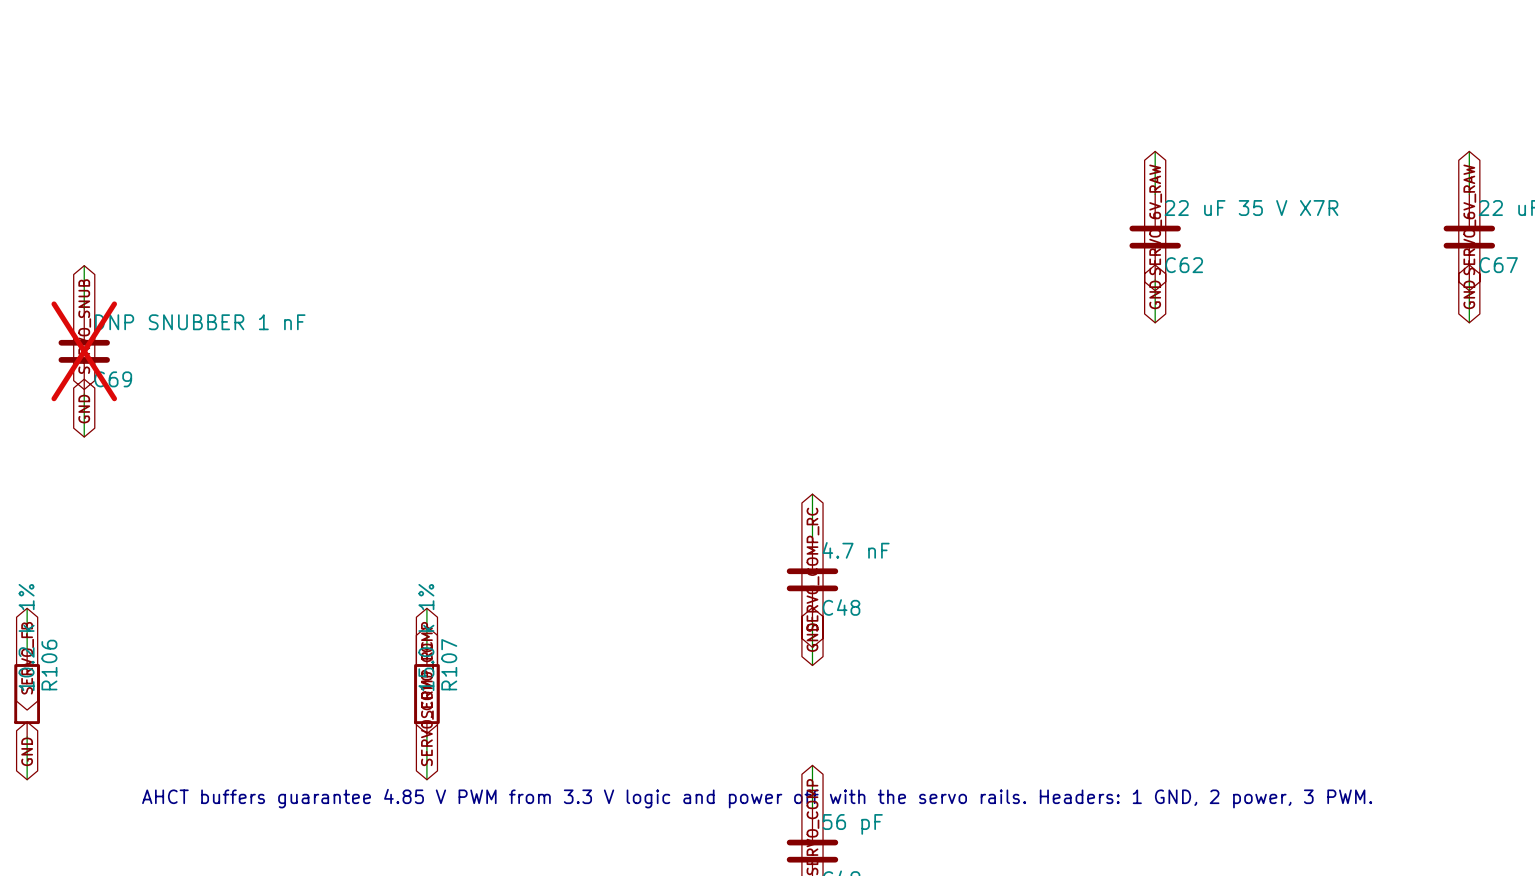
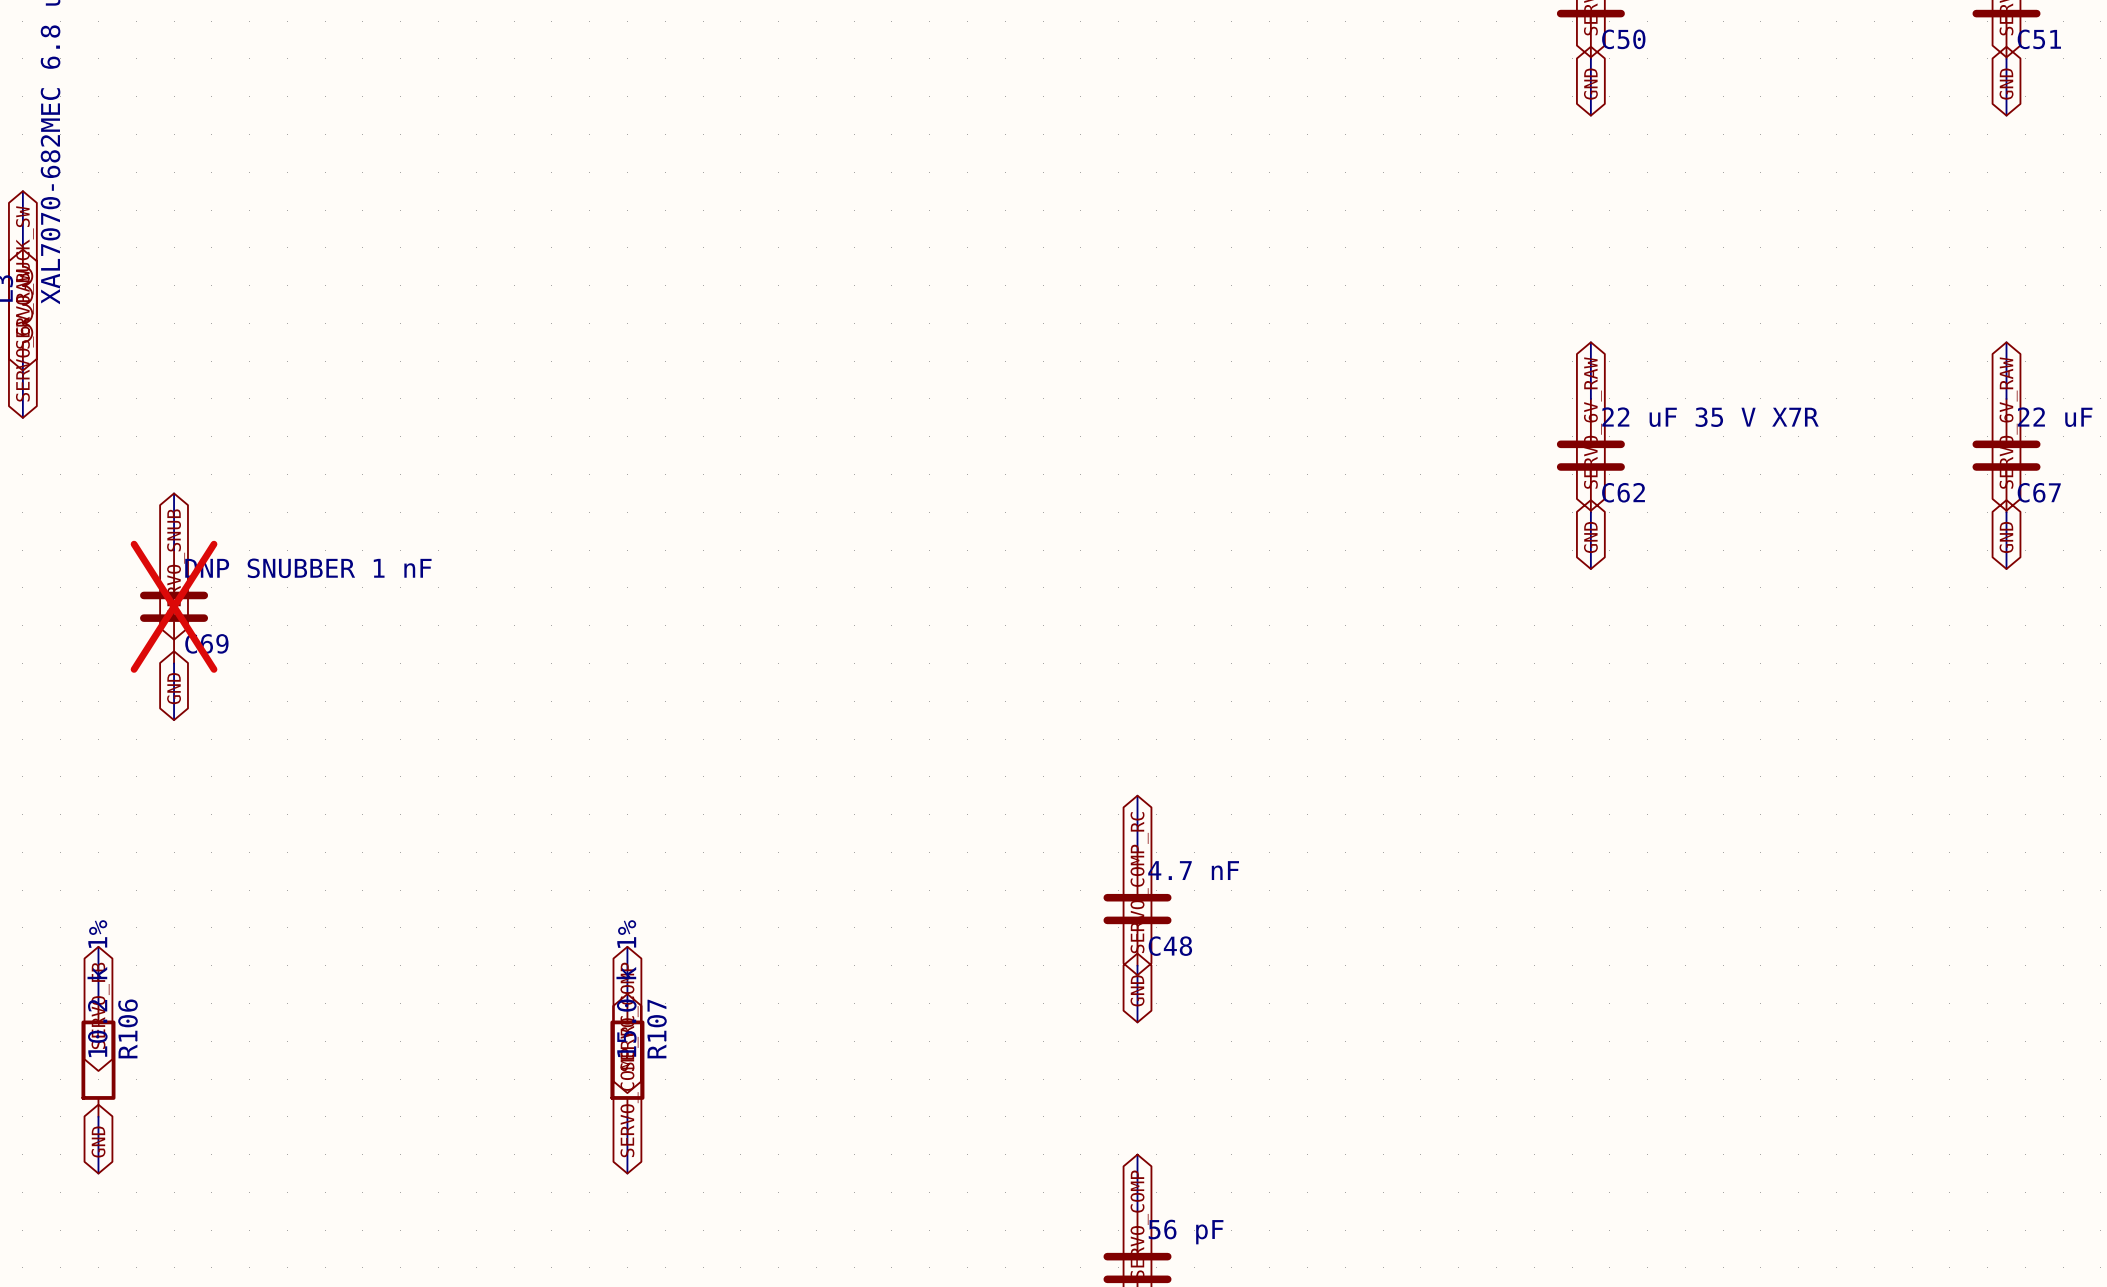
text: AHCT buffers guarantee 4.85 V PWM from 3.3 V logic and power off with the servo rails. Headers: 1 GND, 2 power, 3 PWM. (757, 798) -> none

